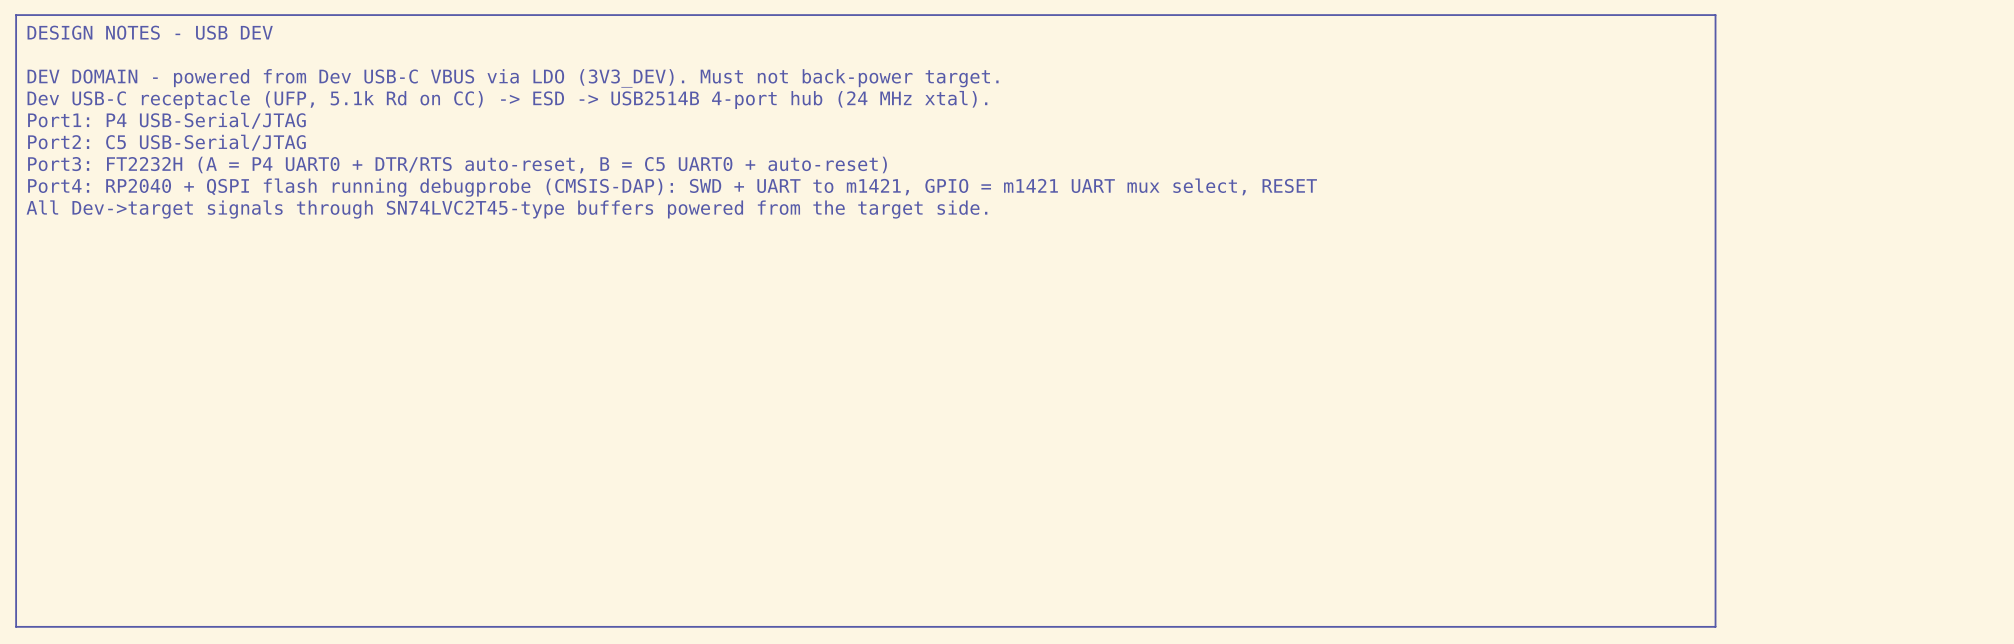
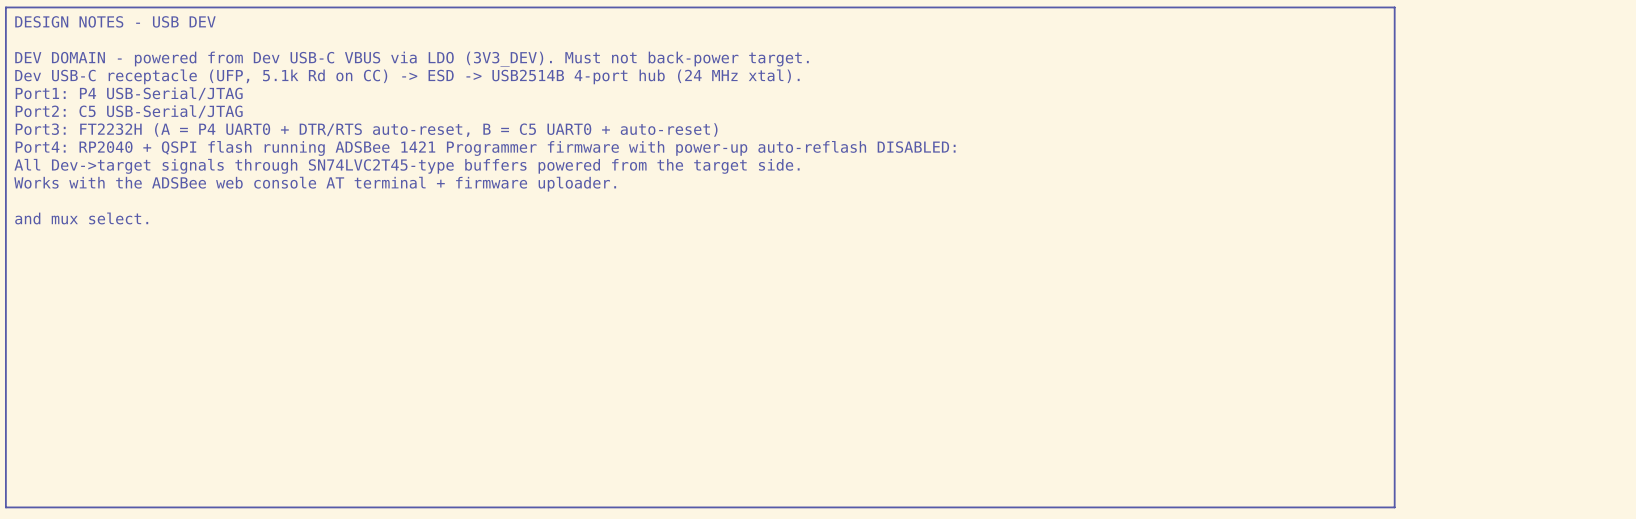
text: Port4: RP2040 + QSPI flash running debugprobe (CMSIS-DAP): SWD + UART to m1421, GPIO = m1421 UART mux select, RESET (672, 187) -> Port4: RP2040 + QSPI flash running ADSBee 1421 Programmer firmware with power-up auto-reflash DISABLED: (485, 148)
text: none -> Works with the ADSBee web console AT terminal + firmware uploader. (315, 184)
text: none -> and mux select. (81, 218)

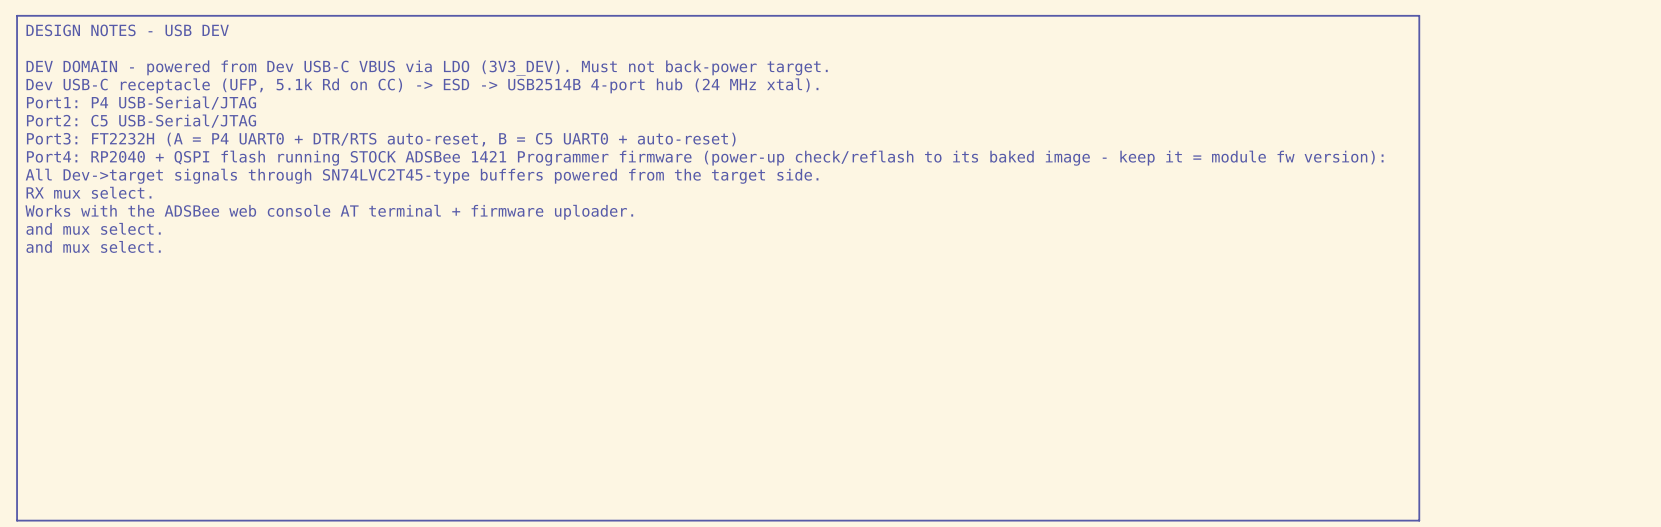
text: Port4: RP2040 + QSPI flash running ADSBee 1421 Programmer firmware with power-up auto-reflash DISABLED: (485, 148) -> Port4: RP2040 + QSPI flash running STOCK ADSBee 1421 Programmer firmware (power-up check/reflash to its baked image - keep it = module fw version): (705, 158)
text: Works with the ADSBee web console AT terminal + firmware uploader. (315, 184) -> RX mux select. (88, 192)
text: none -> Works with the ADSBee web console AT terminal + firmware uploader. (329, 212)
text: none -> and mux select. (93, 246)

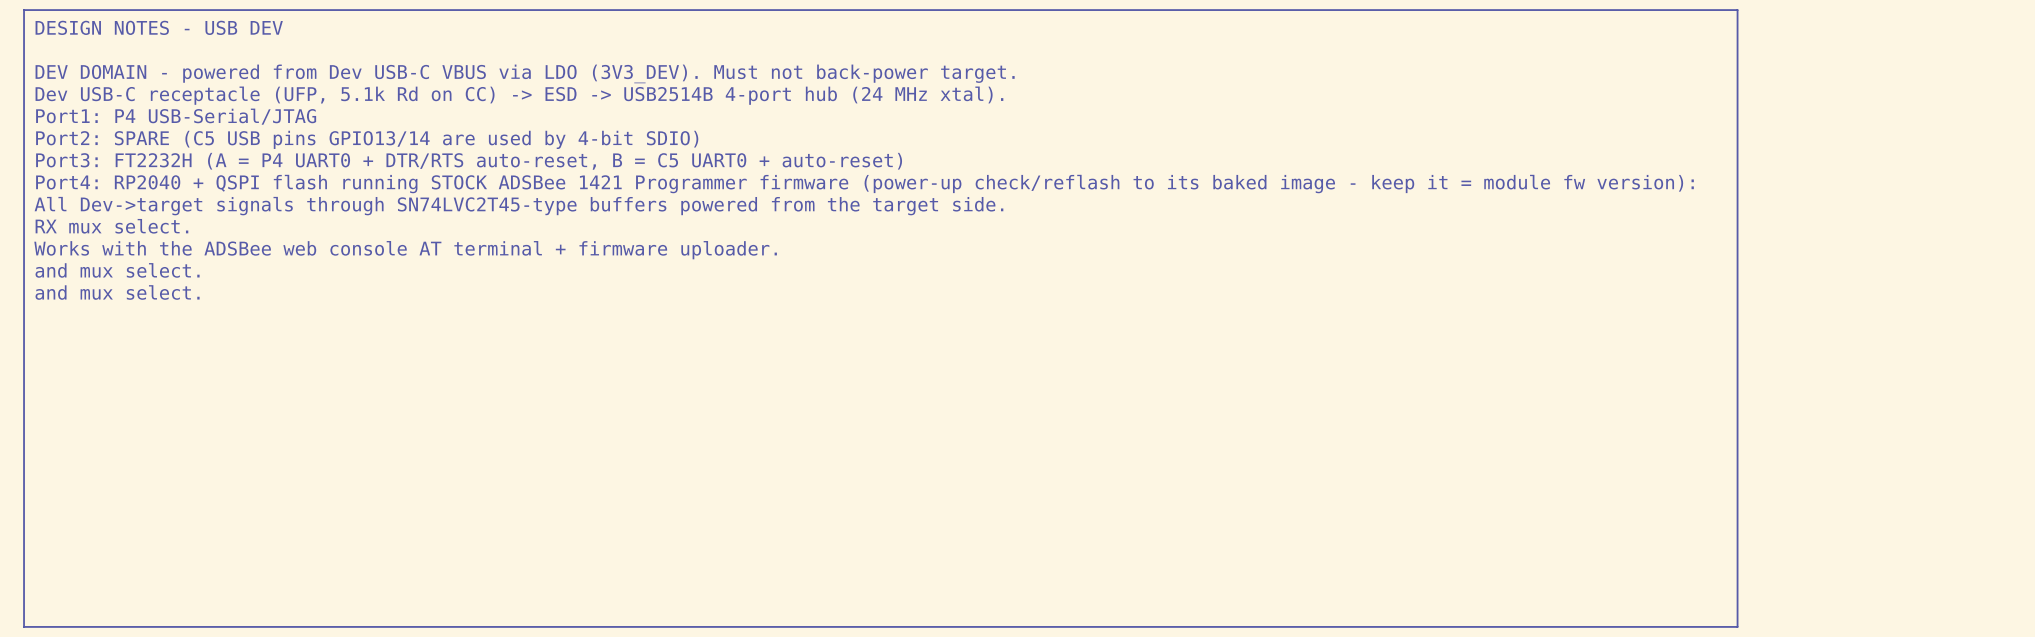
text: Port2: C5 USB-Serial/JTAG (141, 121) -> Port2: SPARE (C5 USB pins GPIO13/14 are used by 4-bit SDIO) (367, 139)

